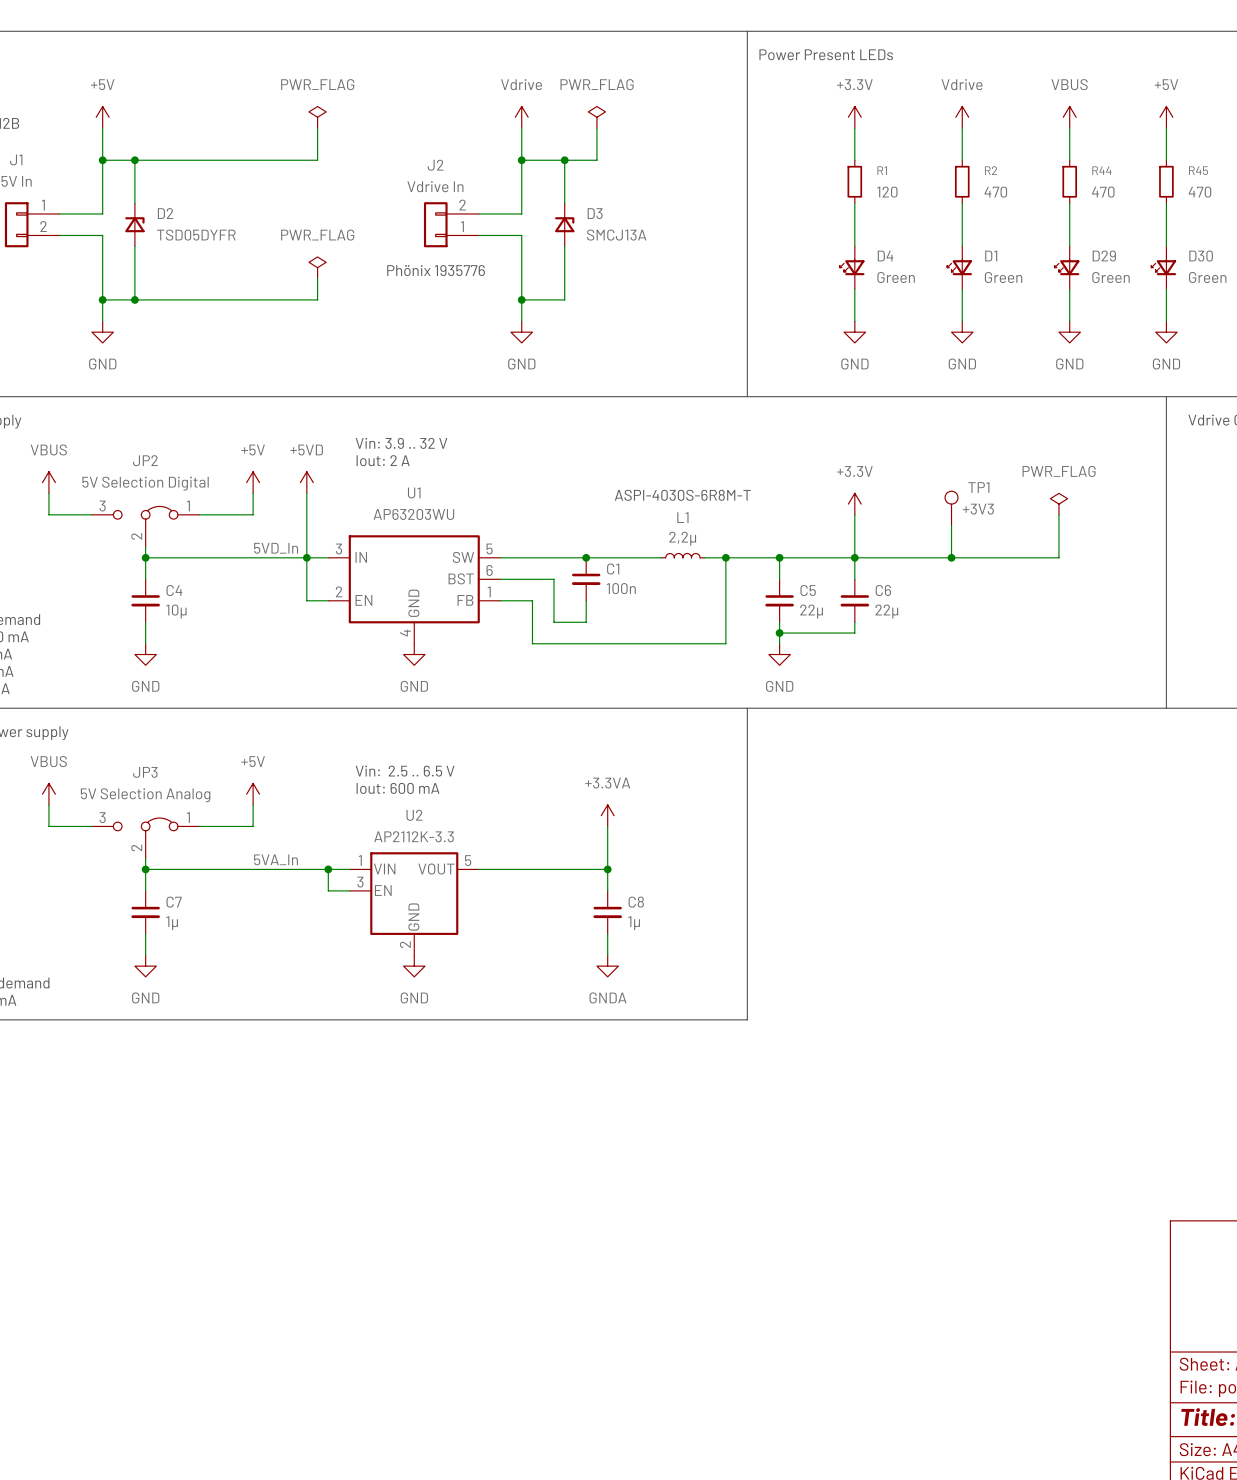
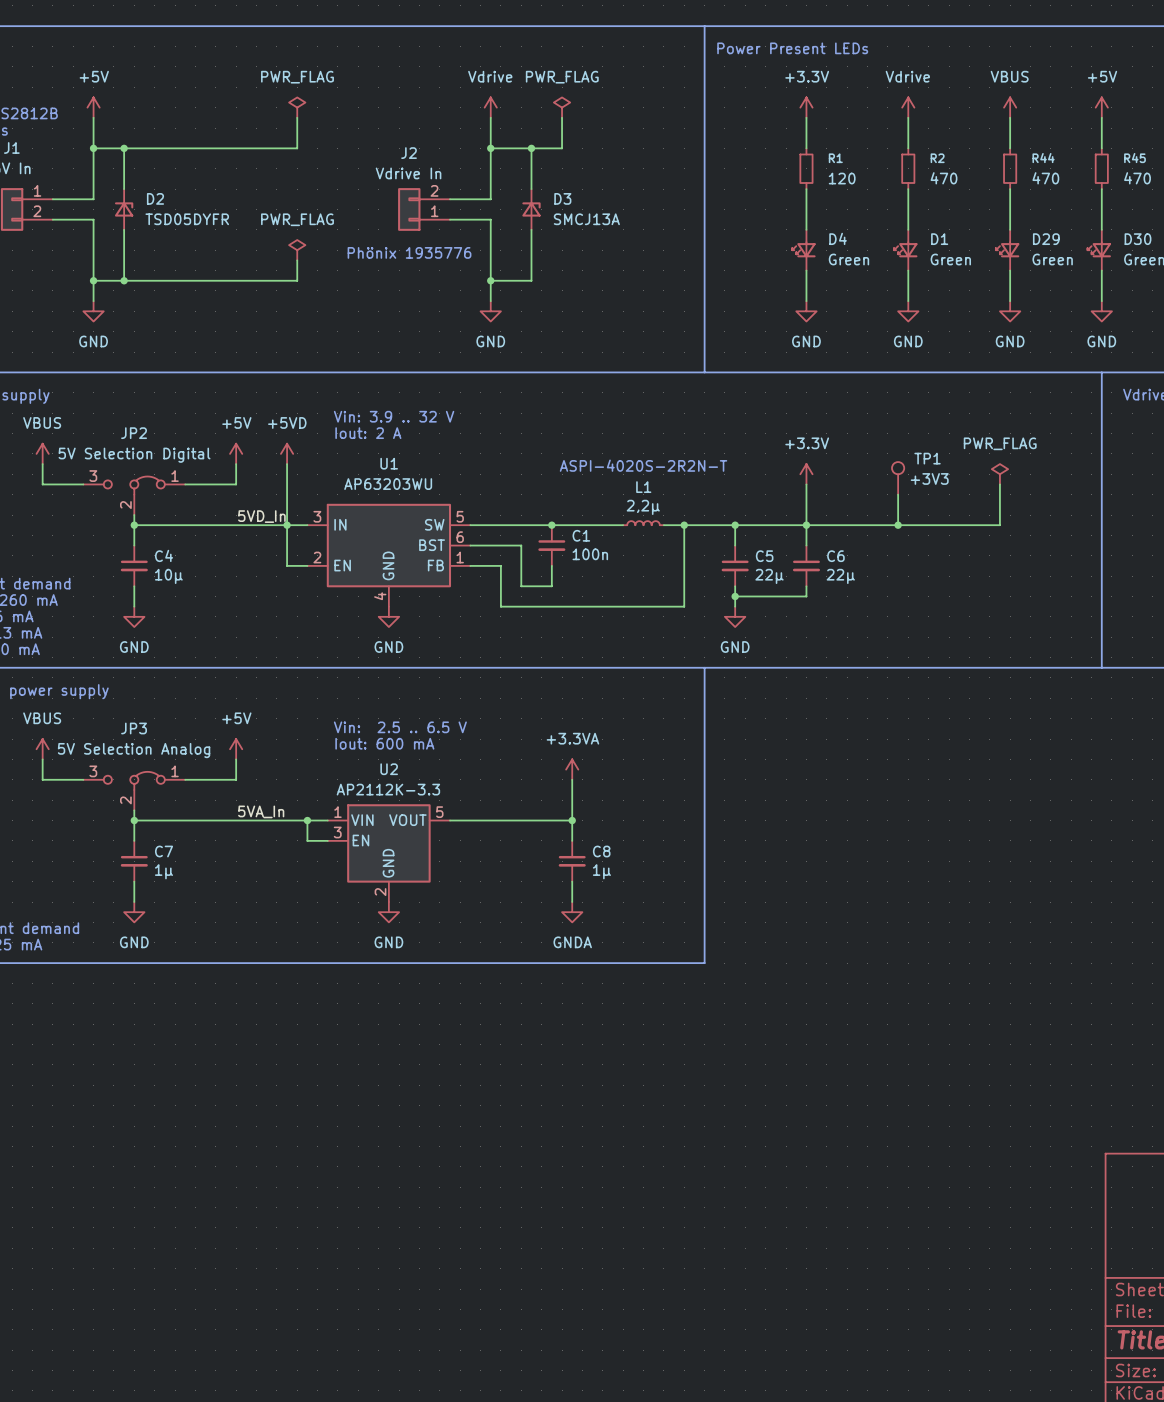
text: ASPI-4030S-6R8M-T (682, 495) -> ASPI-4020S-2R2N-T (643, 465)

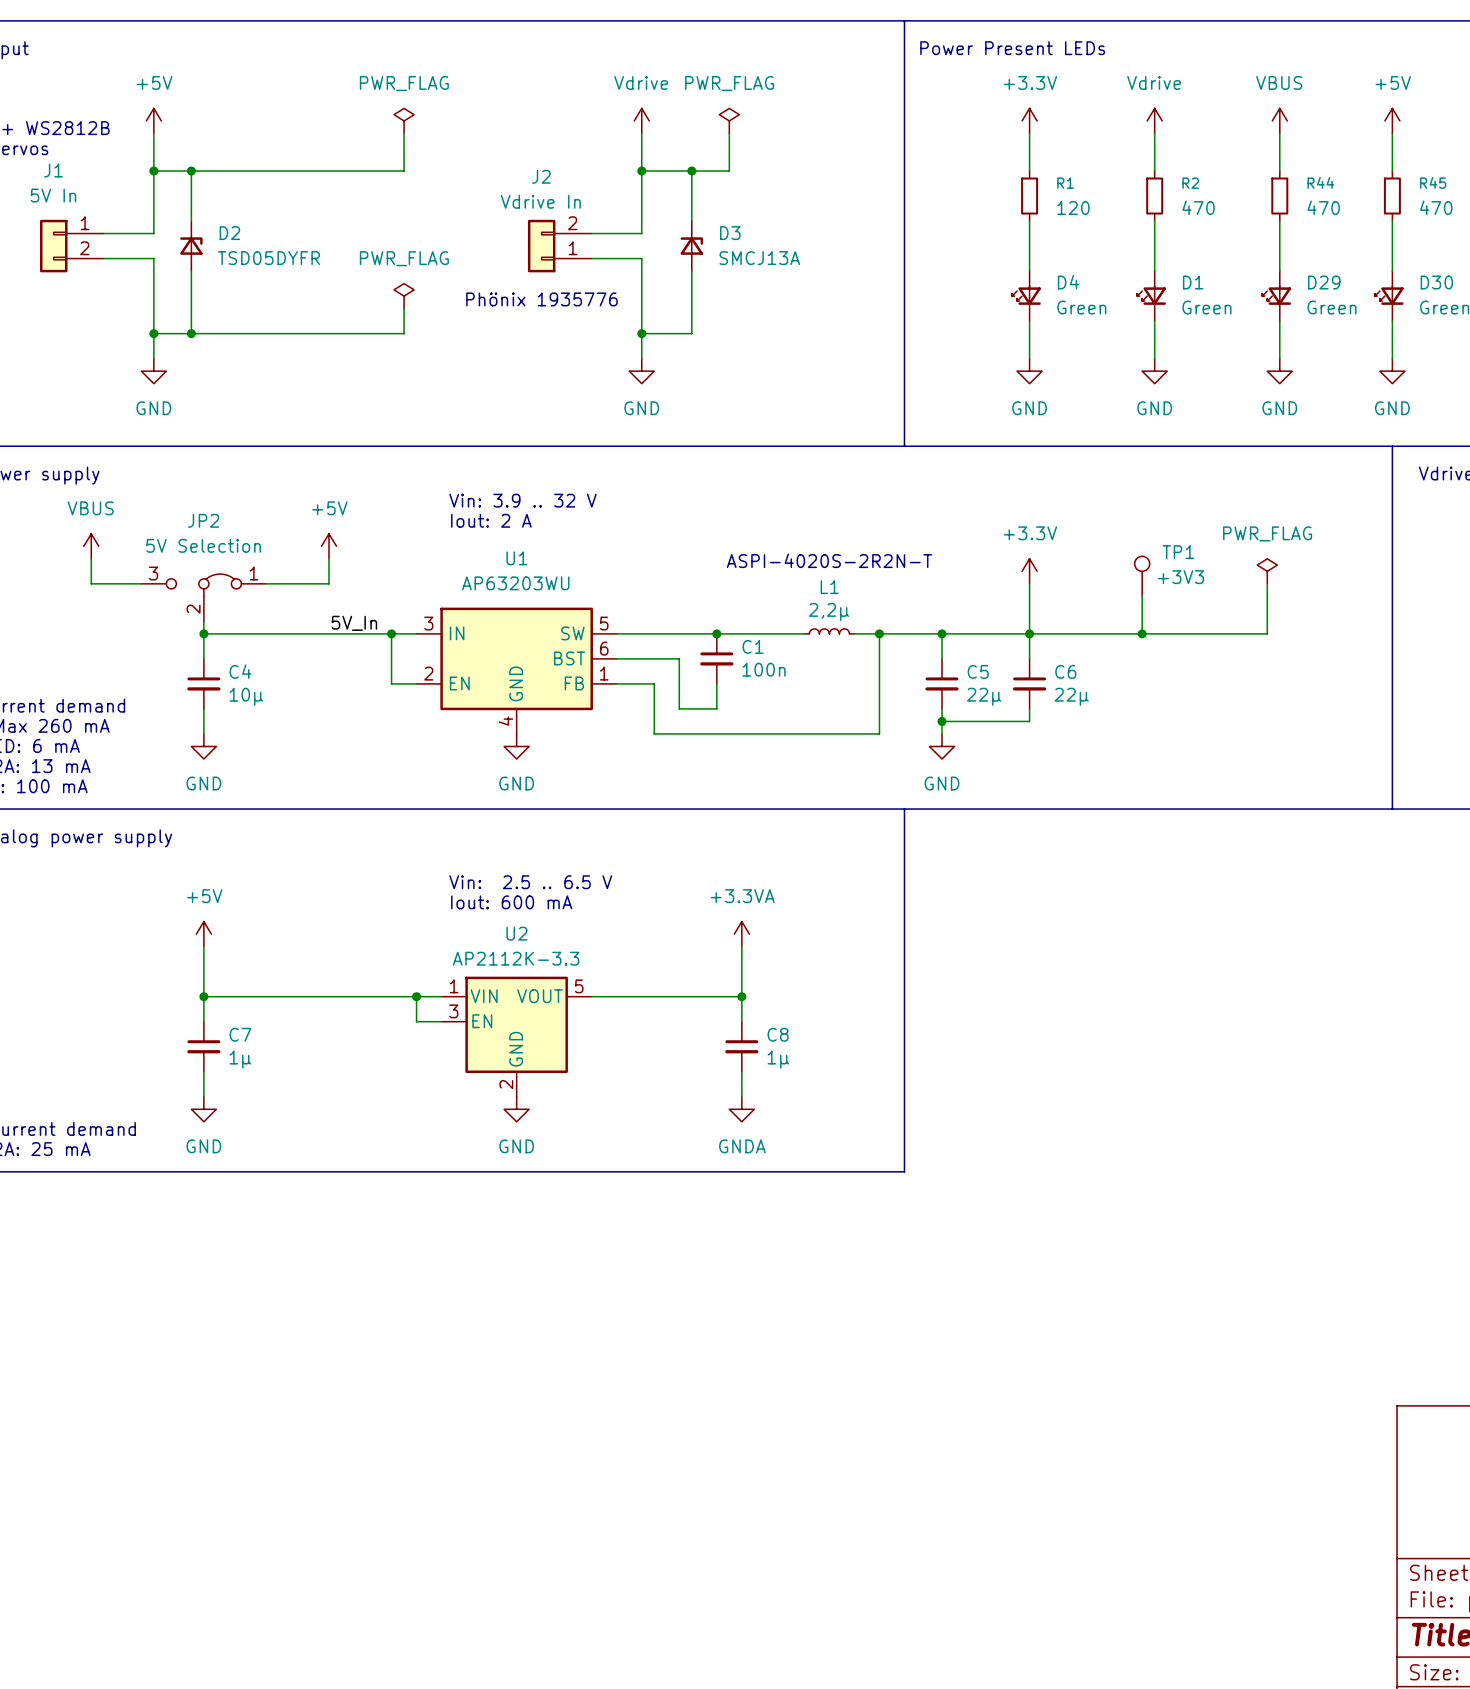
power symbol: +5VD (287, 453) -> none
JP2 value: 5V Selection Digital (134, 455) -> 5V Selection (203, 545)
wire: (287, 464) (287, 525) -> none
label: 5VD_In (261, 516) -> 5V_In (354, 623)
power symbol: VBUS (42, 749) -> none
power symbol position: +5V (236, 749) -> +5V (203, 934)
wire: (42, 759) (42, 779) (83, 779) -> none
wire: (236, 759) (236, 779) (185, 779) -> none
JP3: 5V Selection Analog (134, 791) -> none
label: 5VA_In (261, 811) -> none

